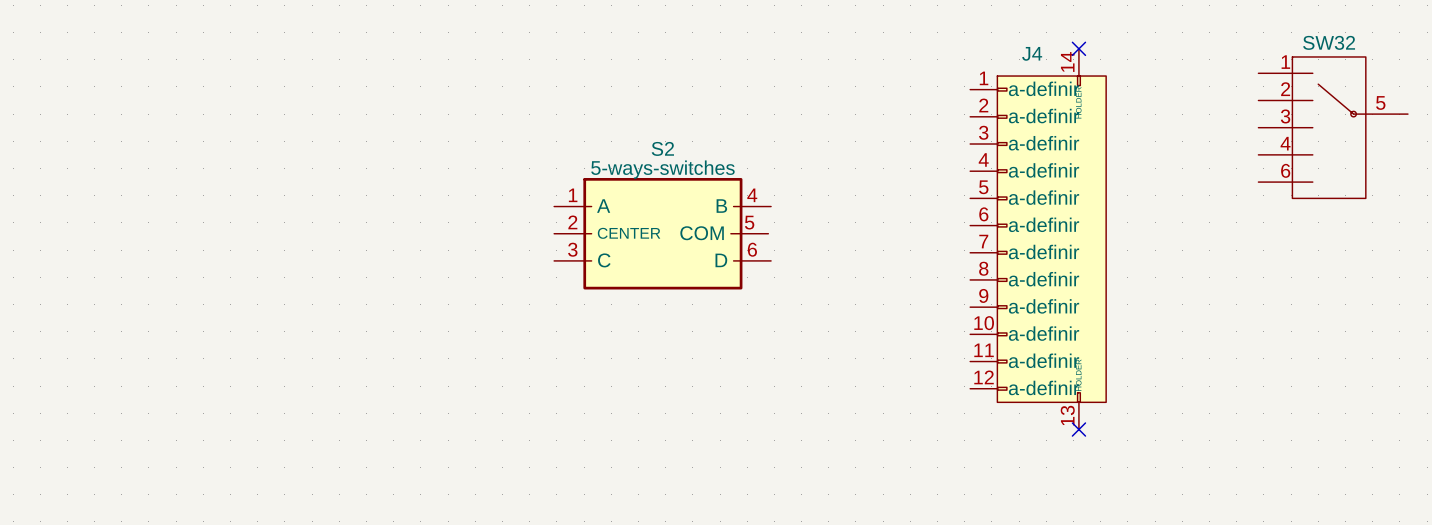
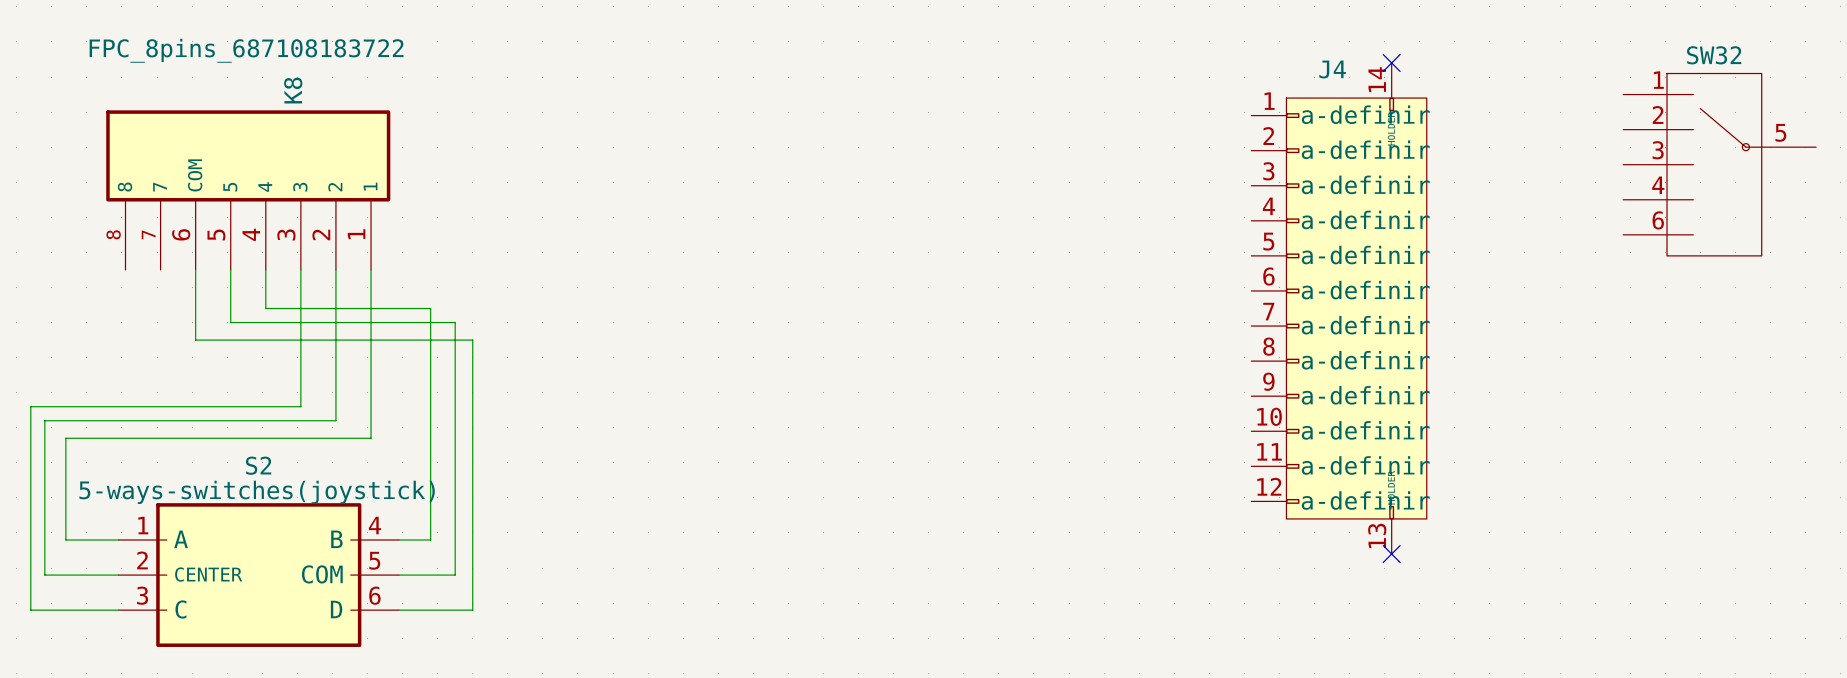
K8: none -> FPC_8pins_687108183722 (248, 190)
S2 value: 5-ways-switches (662, 169) -> 5-ways-switches(joystick) (257, 492)
S2 symbol: [554, 177, 772, 290] -> [118, 503, 400, 647]
wire: none -> (195, 269) (195, 340) (472, 340) (472, 610) (399, 610)
wire: none -> (230, 269) (230, 322) (455, 322) (455, 575) (399, 575)
wire: none -> (265, 269) (265, 308) (430, 308) (430, 539) (399, 539)
wire: none -> (300, 269) (300, 406) (30, 406) (30, 610) (118, 610)
wire: none -> (335, 269) (335, 420) (44, 420) (44, 575) (118, 575)
wire: none -> (371, 269) (371, 438) (65, 438) (65, 539) (118, 539)

